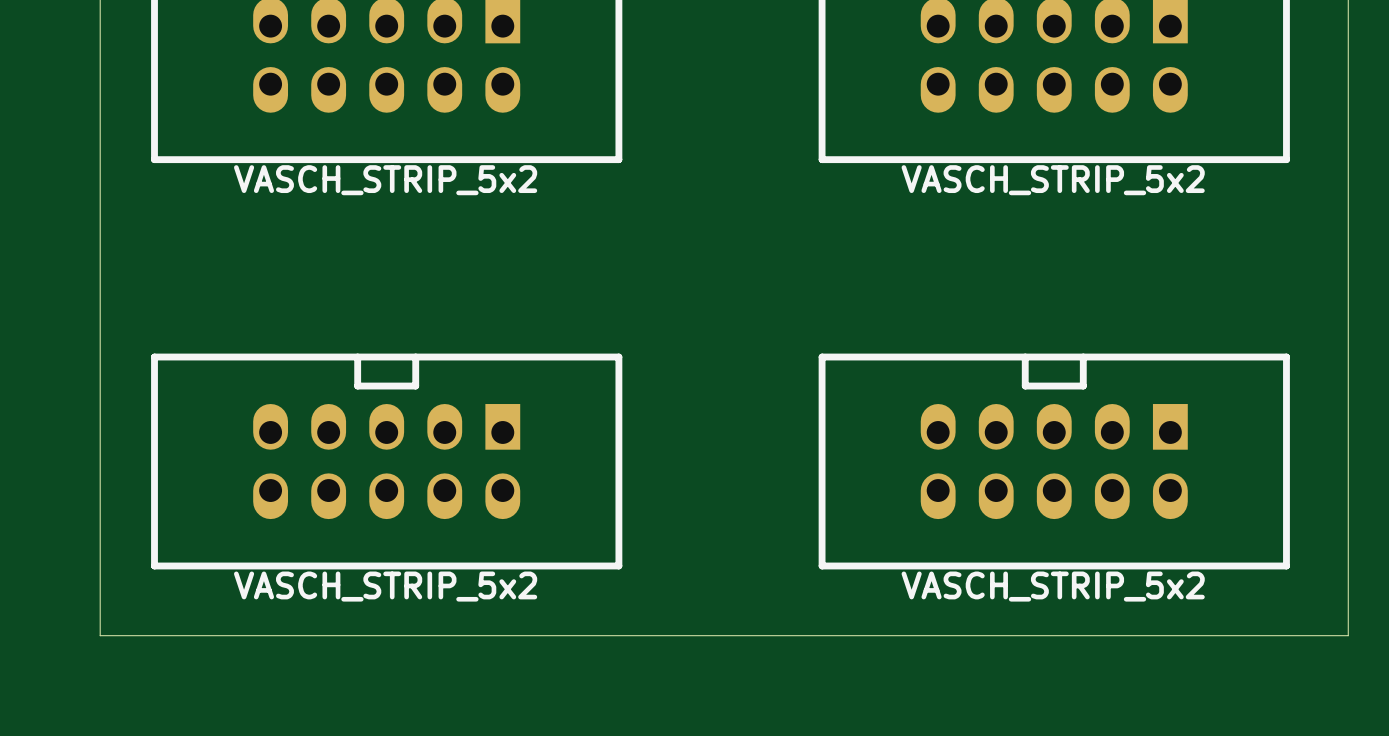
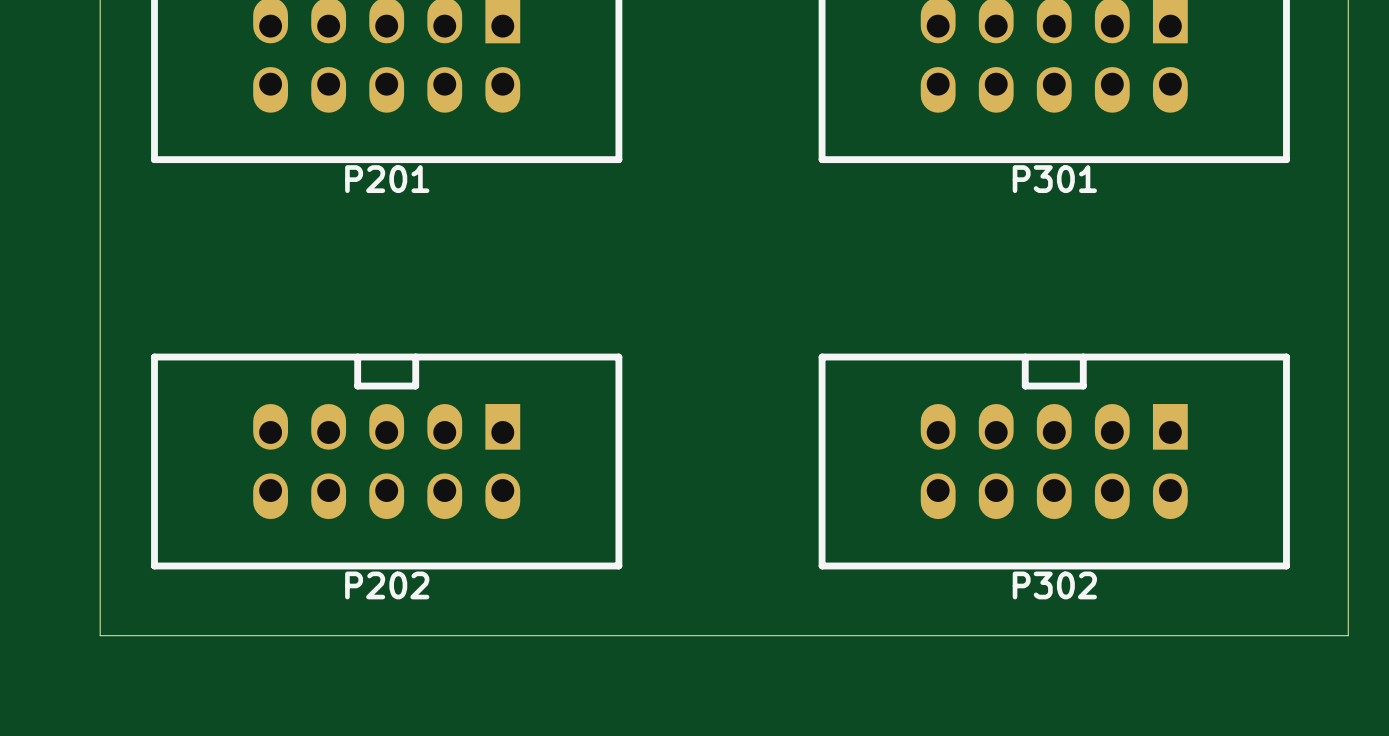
VASCH_STRIP_5x2 name: VASCH_STRIP_5x2 (385, 180) -> P201 (387, 179)
VASCH_STRIP_5x2 name: VASCH_STRIP_5x2 (1053, 180) -> P301 (1054, 179)
VASCH_STRIP_5x2 name: VASCH_STRIP_5x2 (385, 586) -> P202 (387, 585)
VASCH_STRIP_5x2 name: VASCH_STRIP_5x2 (1053, 586) -> P302 (1054, 585)

